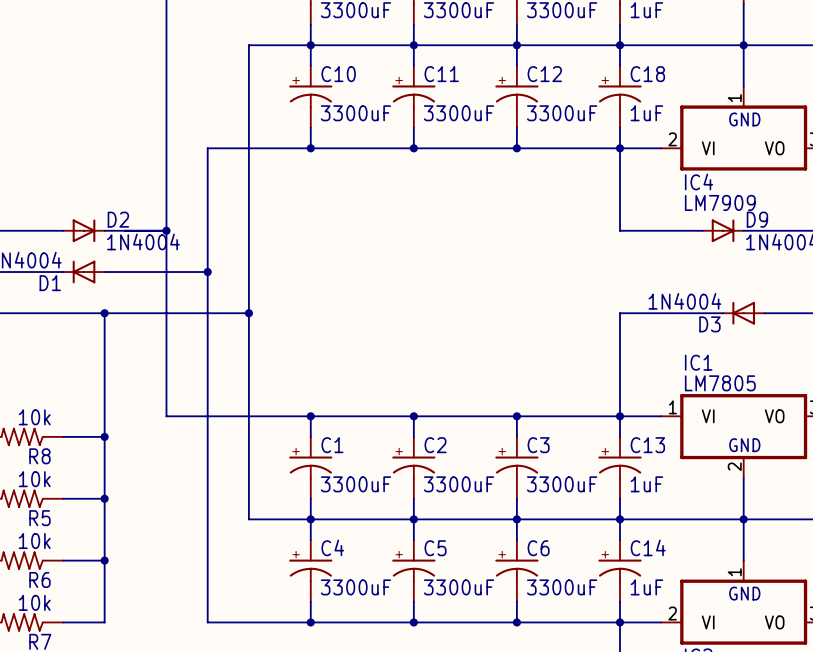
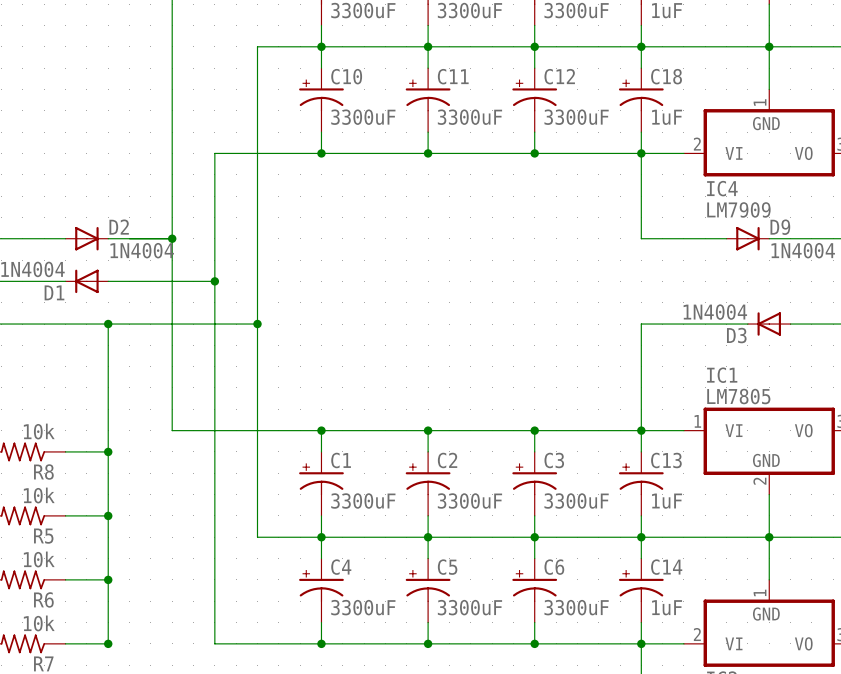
junction: none -> (108, 643)

